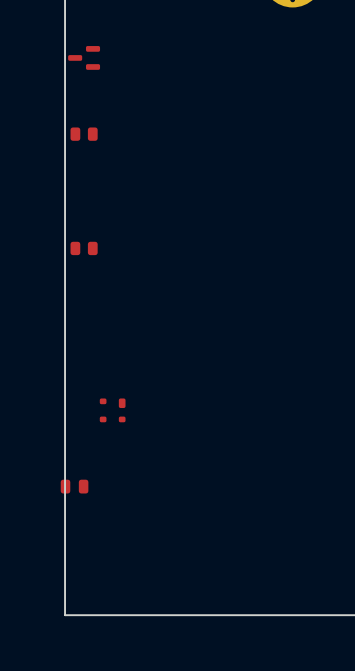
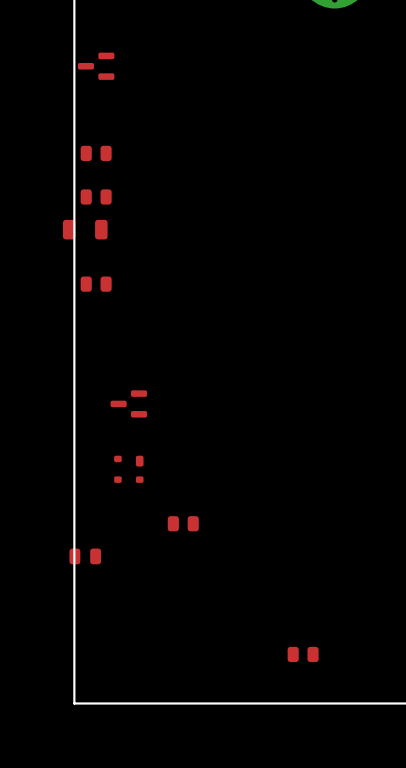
part: none -> (96, 196)
part: none -> (85, 229)
part: none -> (128, 403)
part: none -> (183, 523)
part: none -> (303, 654)

